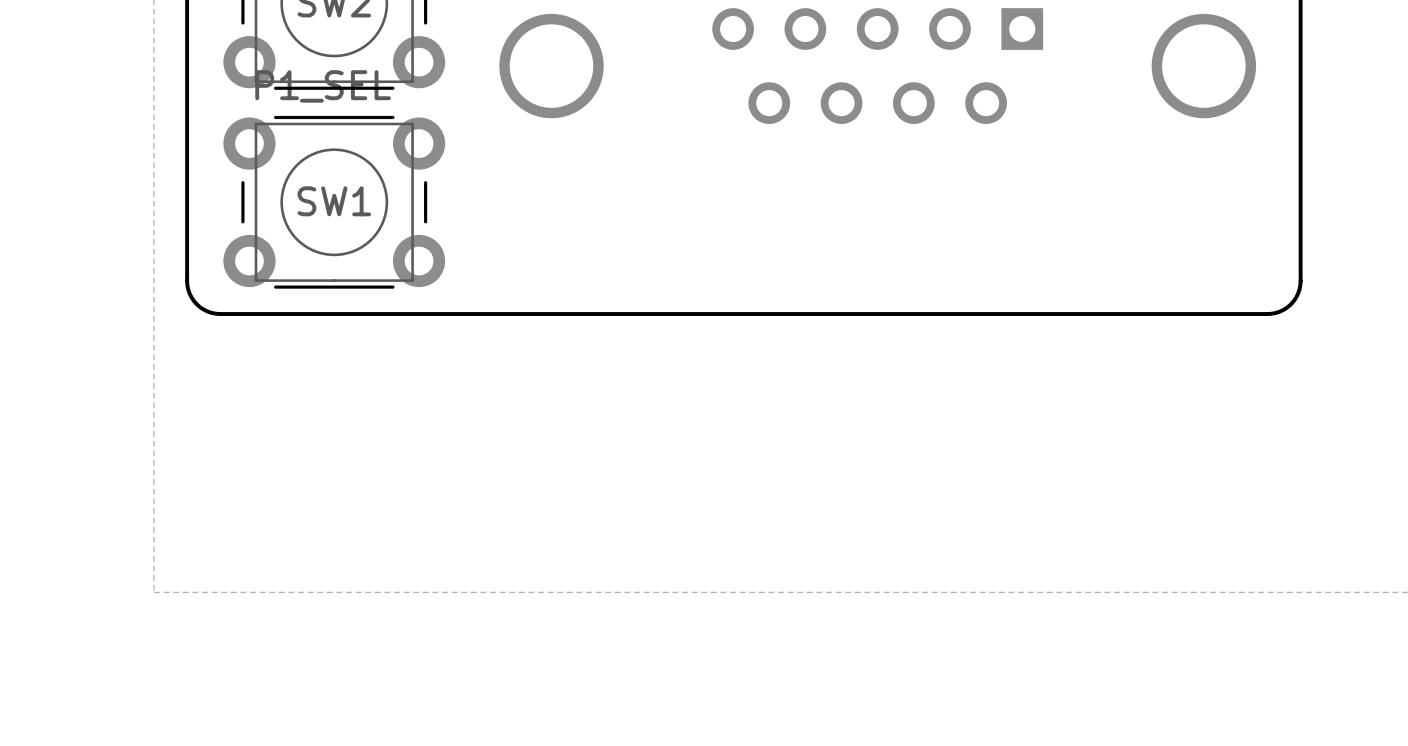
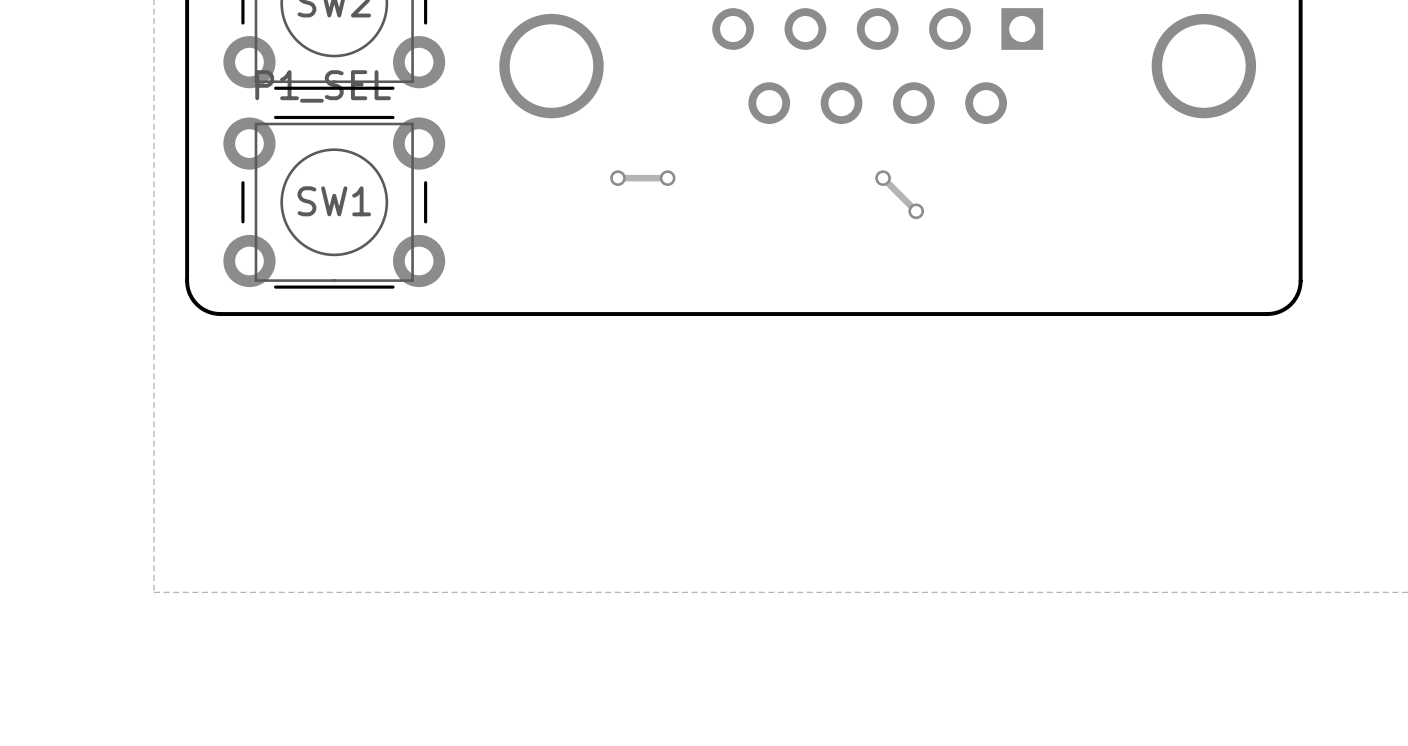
via: none -> (617, 178)
track: none -> (667, 178) (617, 178)
via: none -> (667, 178)
track: none -> (883, 178) (916, 211)
via: none -> (883, 178)
via: none -> (916, 211)

